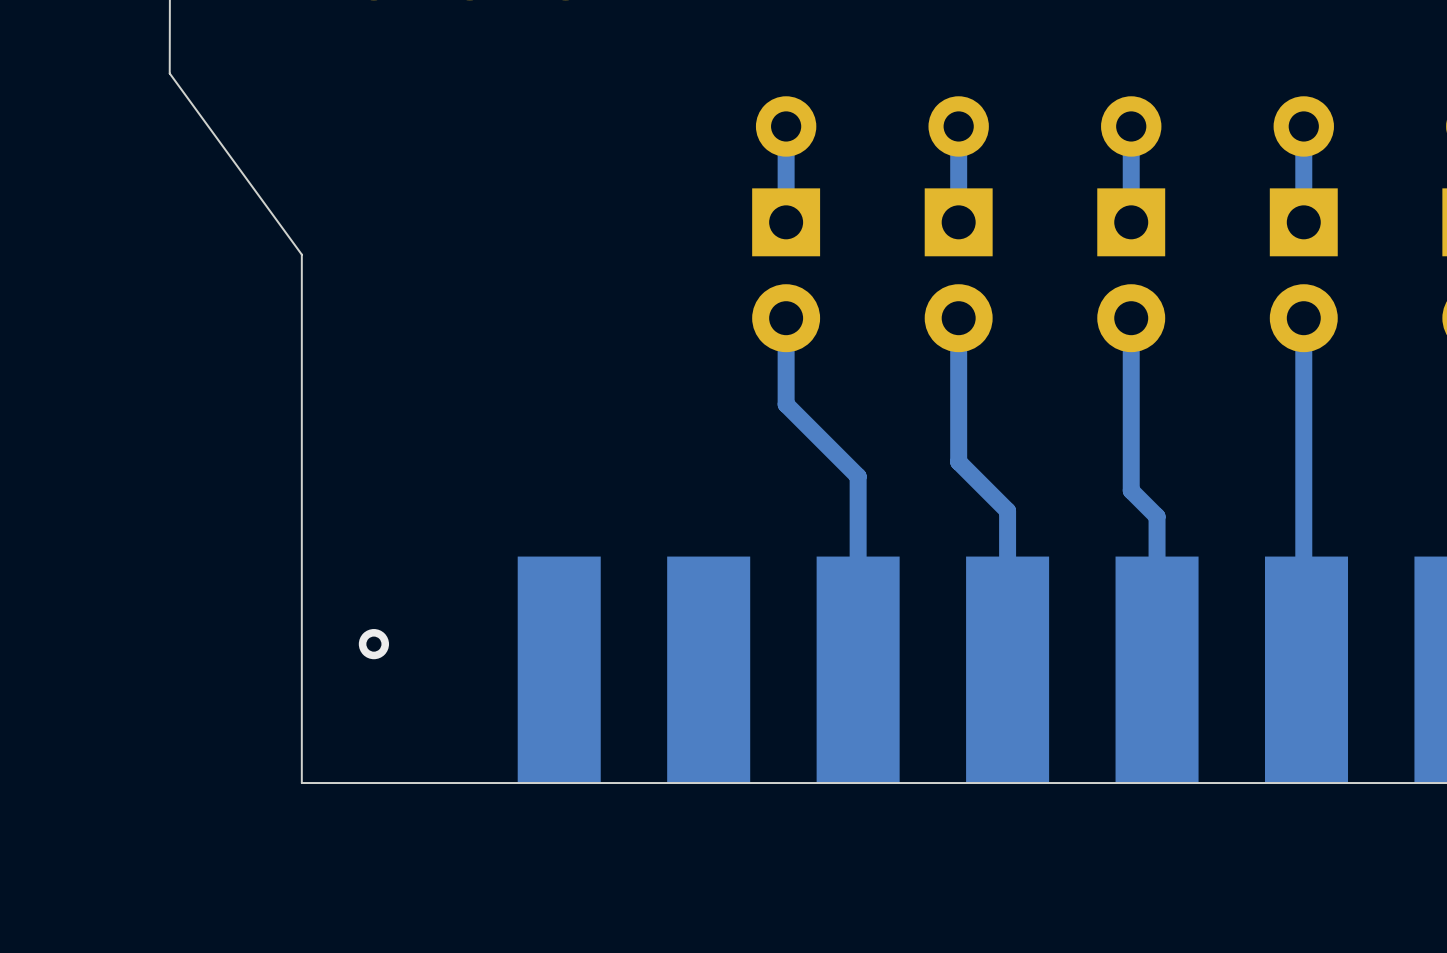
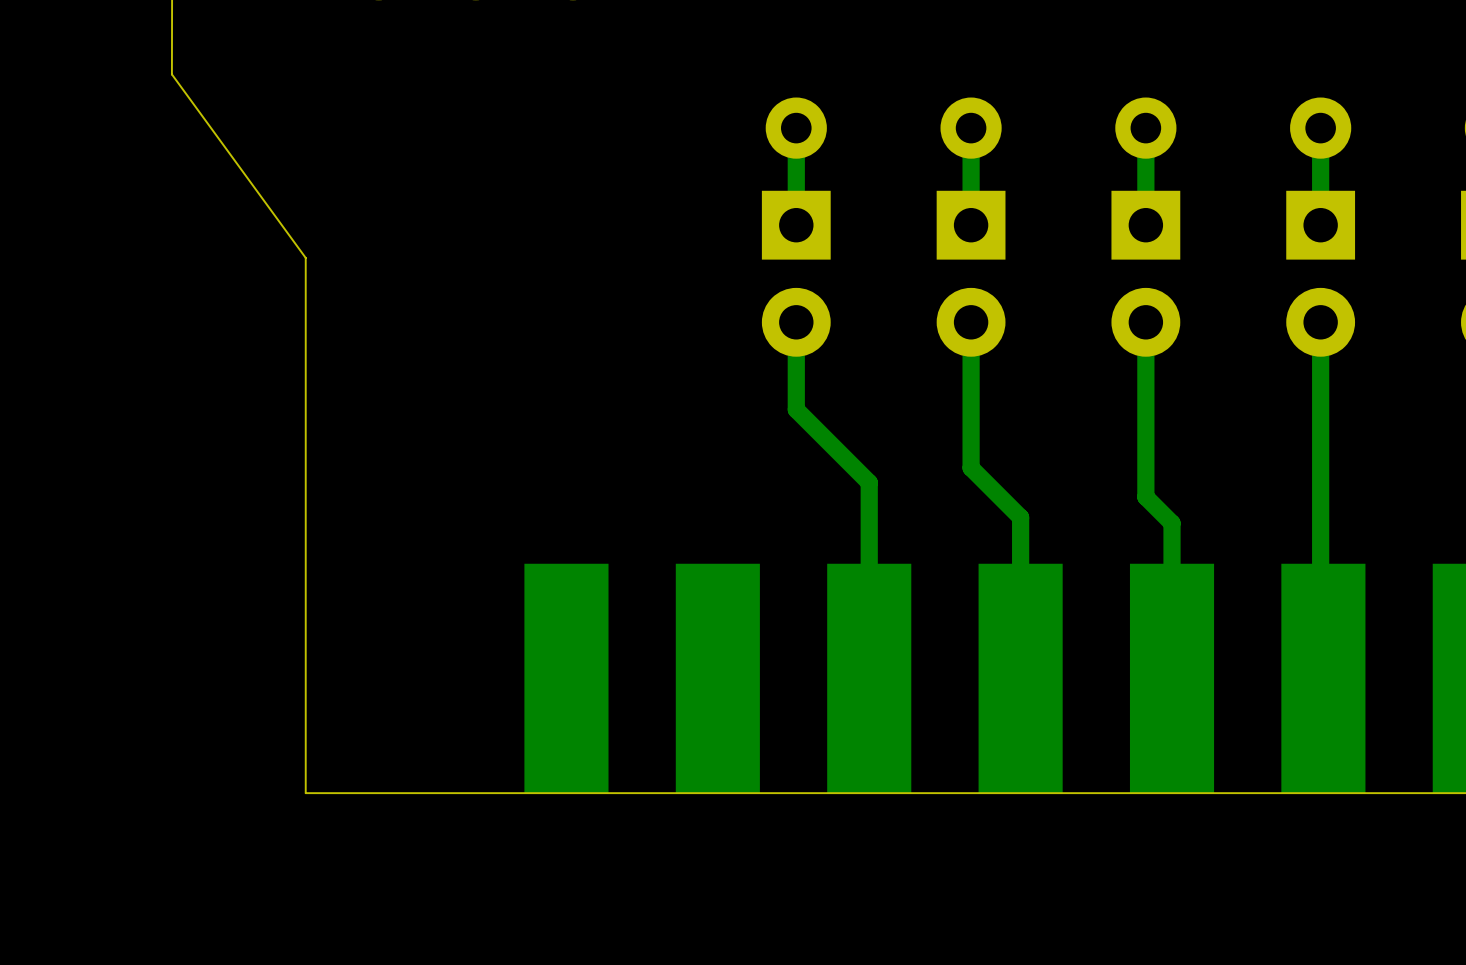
via: (373, 644) -> none

